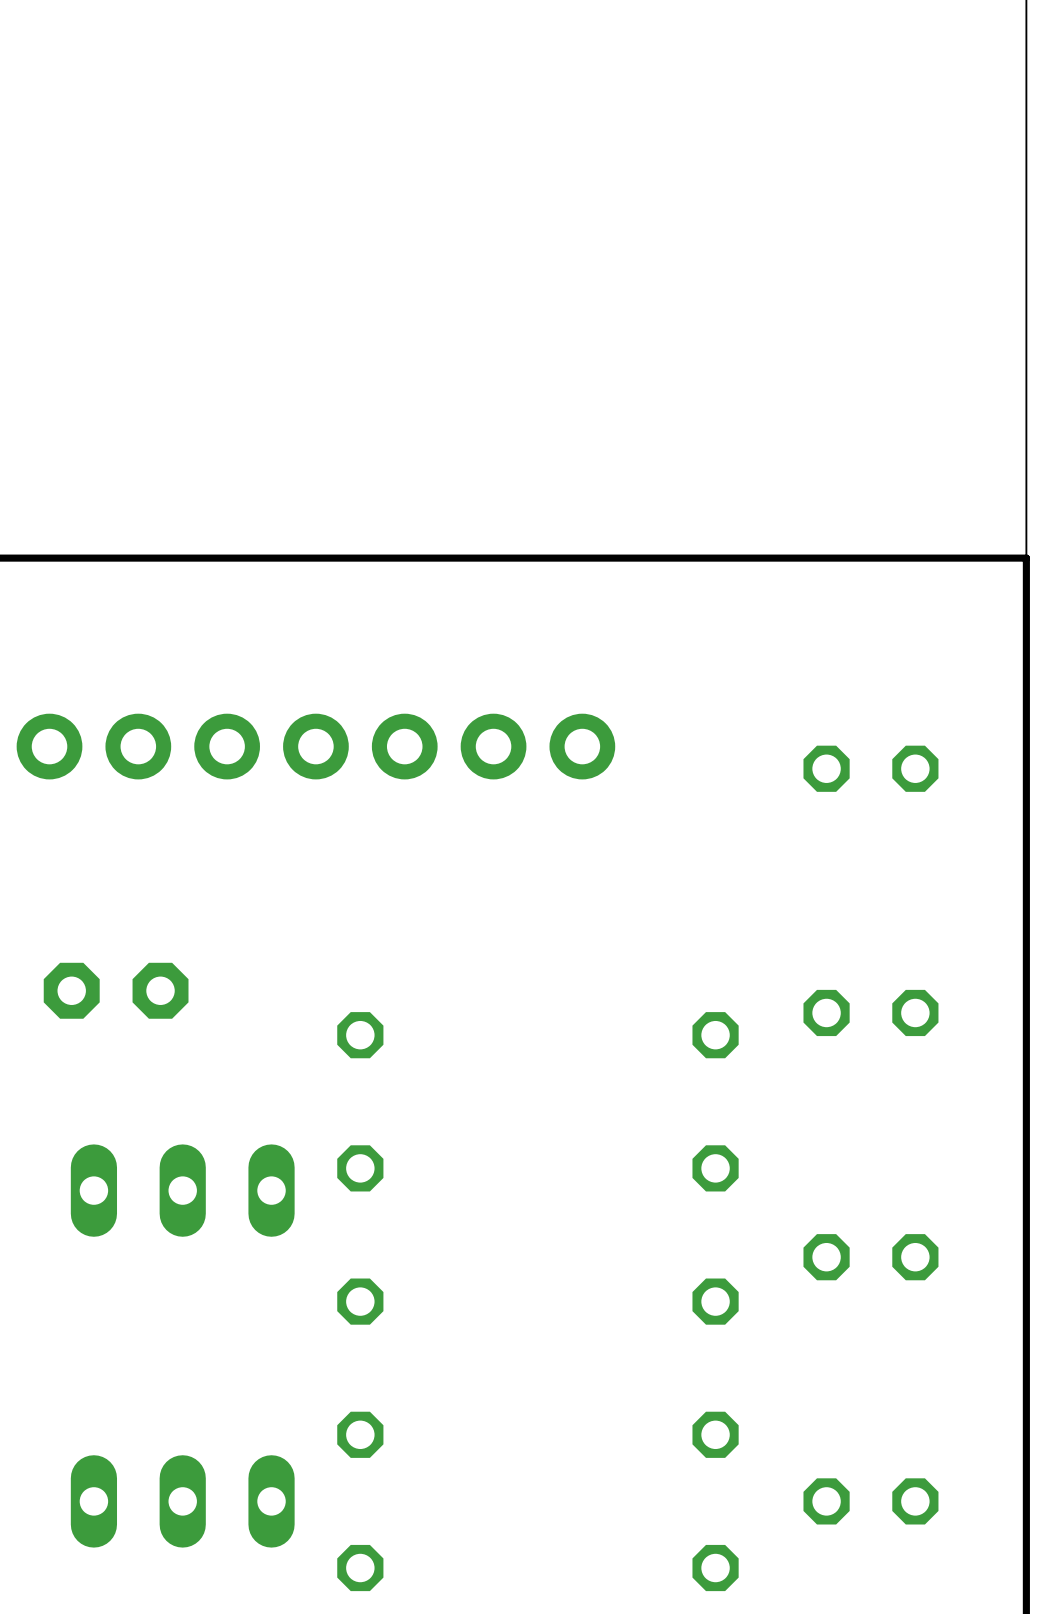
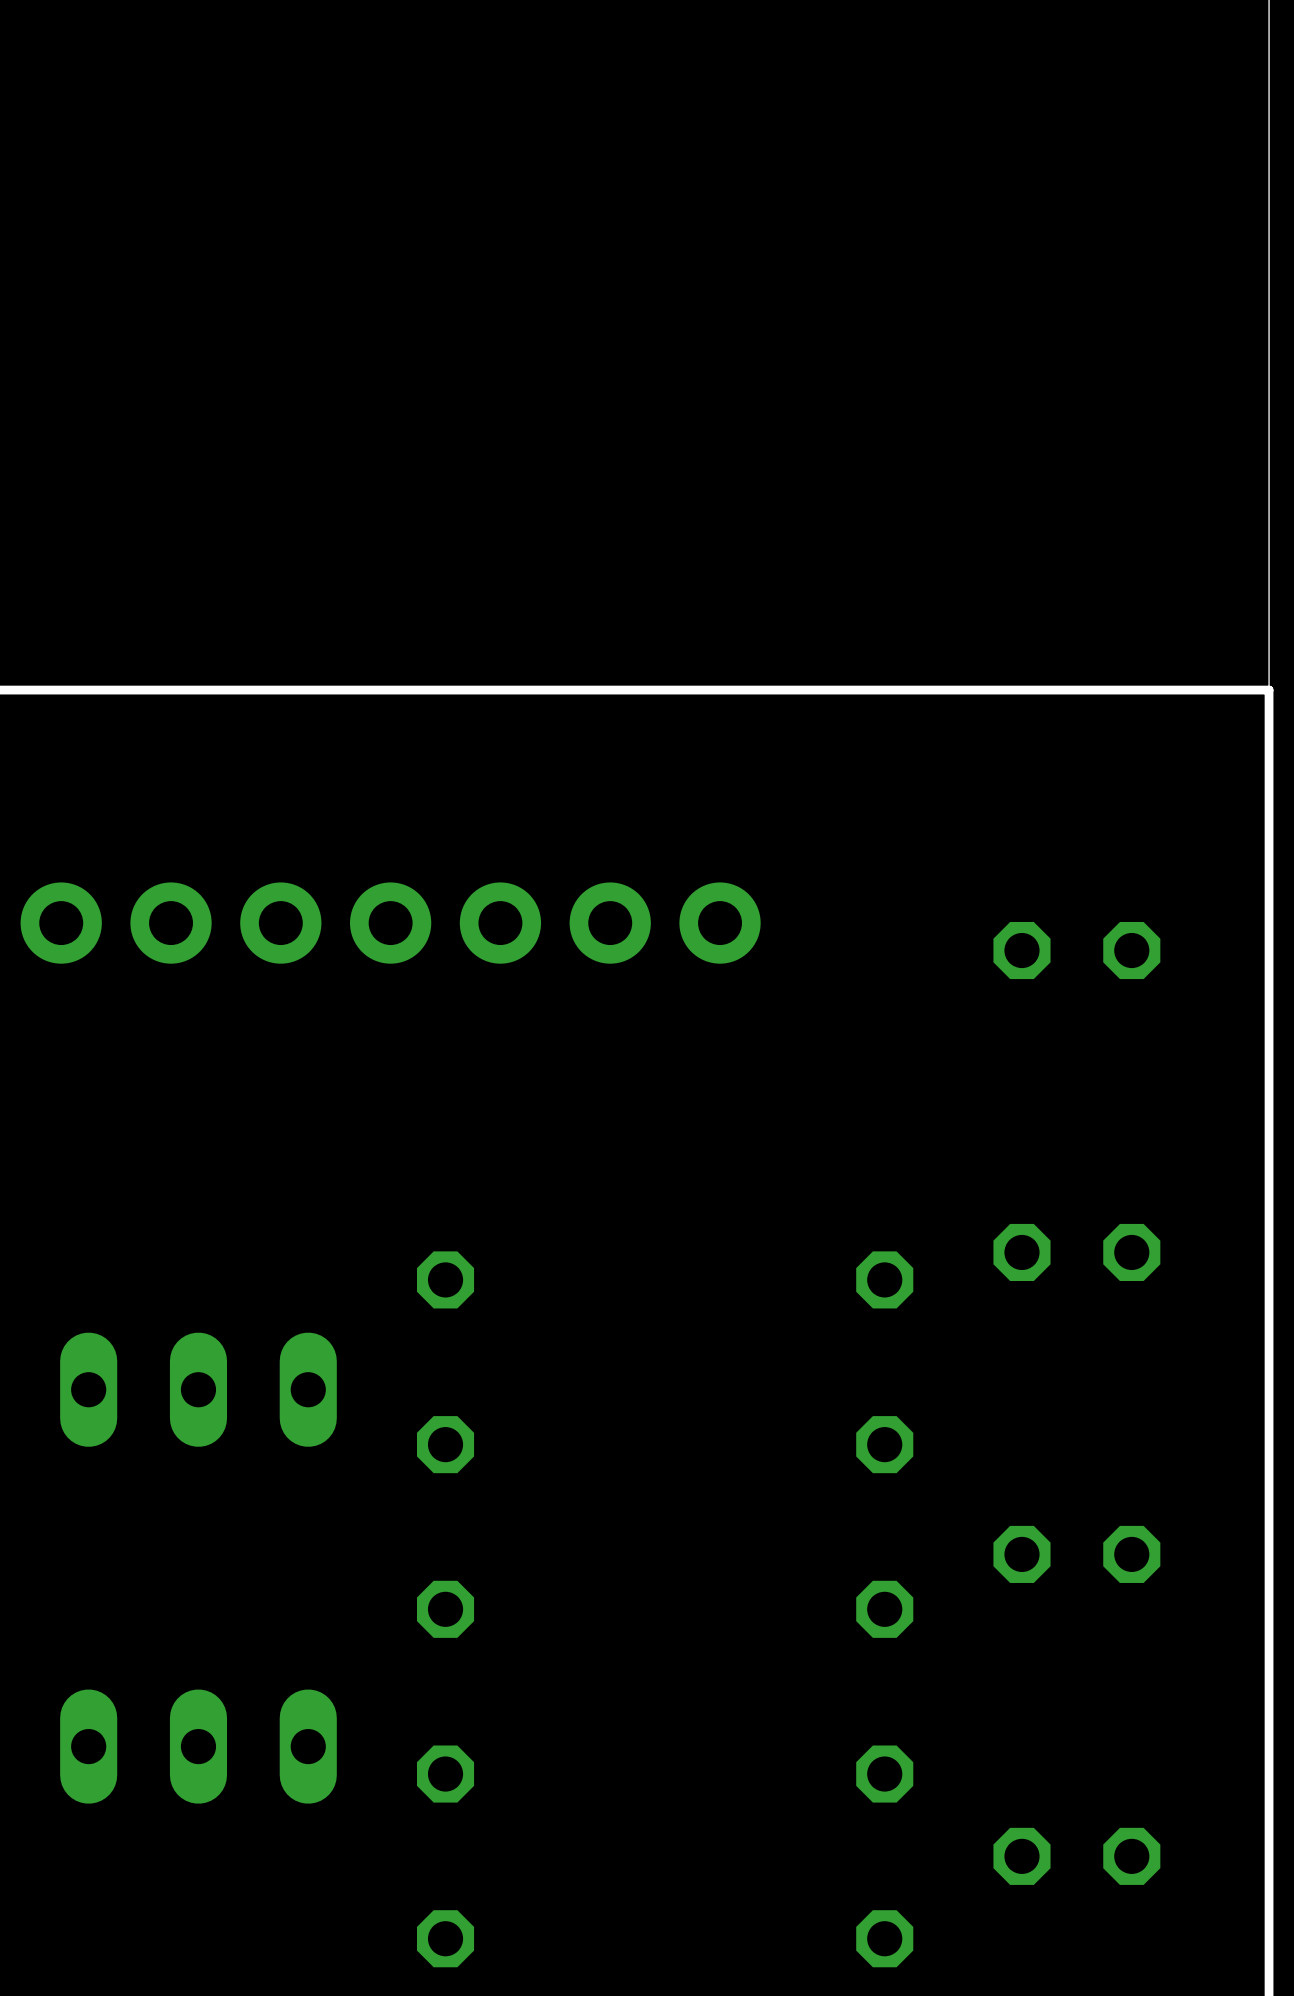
part: (116, 990) -> none
part position: (182, 1190) -> (198, 1389)
part position: (182, 1501) -> (198, 1746)

